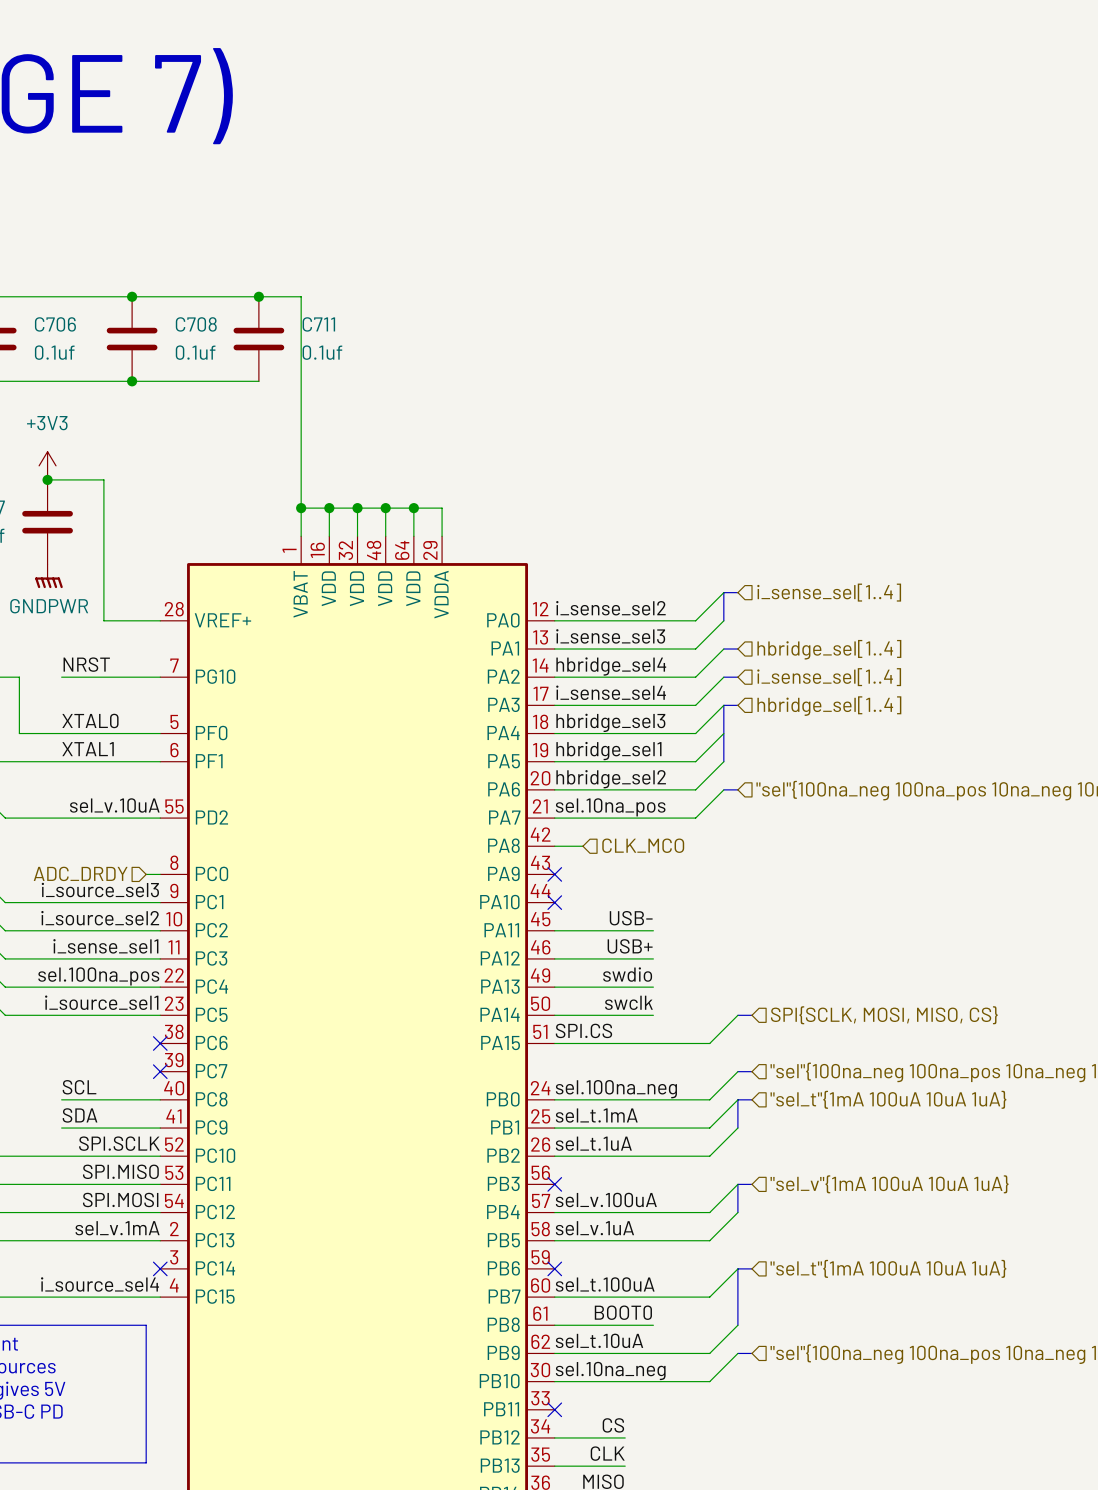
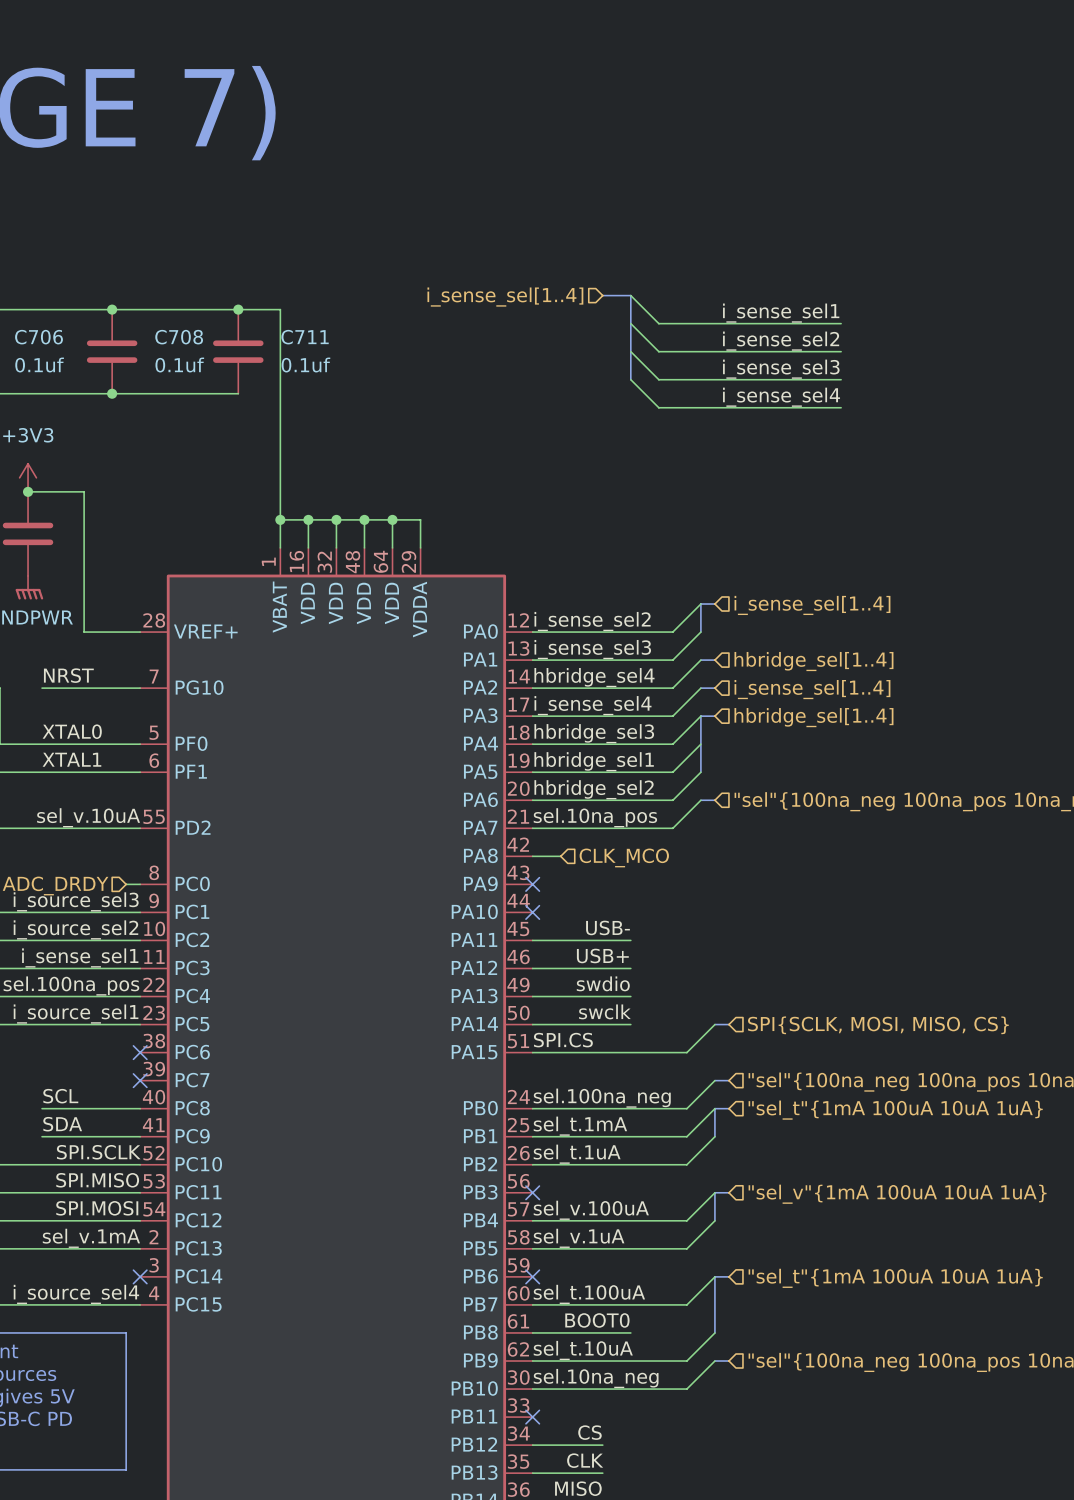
hierarchical label: none -> i_sense_sel[1..4] (505, 297)
bus: none -> (602, 295) (630, 295) (630, 379)
wire: none -> (630, 295) (658, 323) (841, 323)
label: none -> i_sense_sel1 (781, 313)
wire: none -> (630, 323) (658, 351) (841, 351)
label: none -> i_sense_sel2 (781, 341)
wire: none -> (630, 351) (658, 379) (841, 379)
label: none -> i_sense_sel3 (781, 369)
wire: none -> (630, 379) (658, 407) (841, 407)
label: none -> i_sense_sel4 (781, 397)

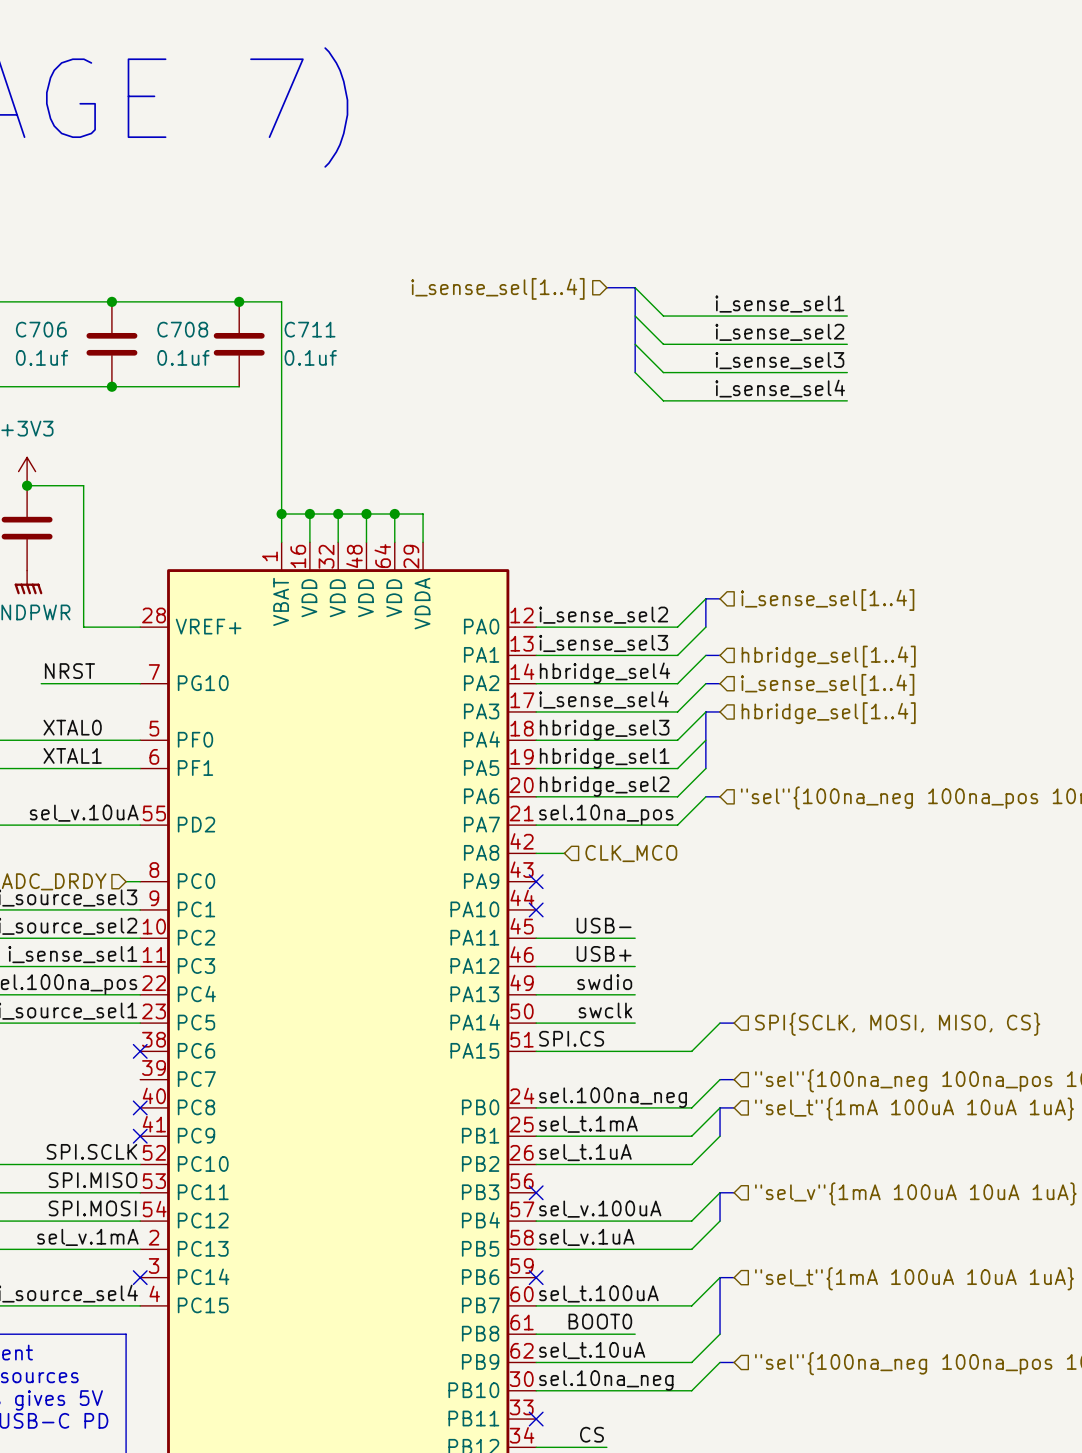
no-connect mark: (140, 1080) -> none
label: SCL (60, 1096) -> none
wire: (42, 1108) (140, 1108) -> none
no-connect mark: none -> (140, 1107)
label: SDA (62, 1124) -> none
wire: (42, 1136) (140, 1136) -> none
no-connect mark: none -> (140, 1136)

